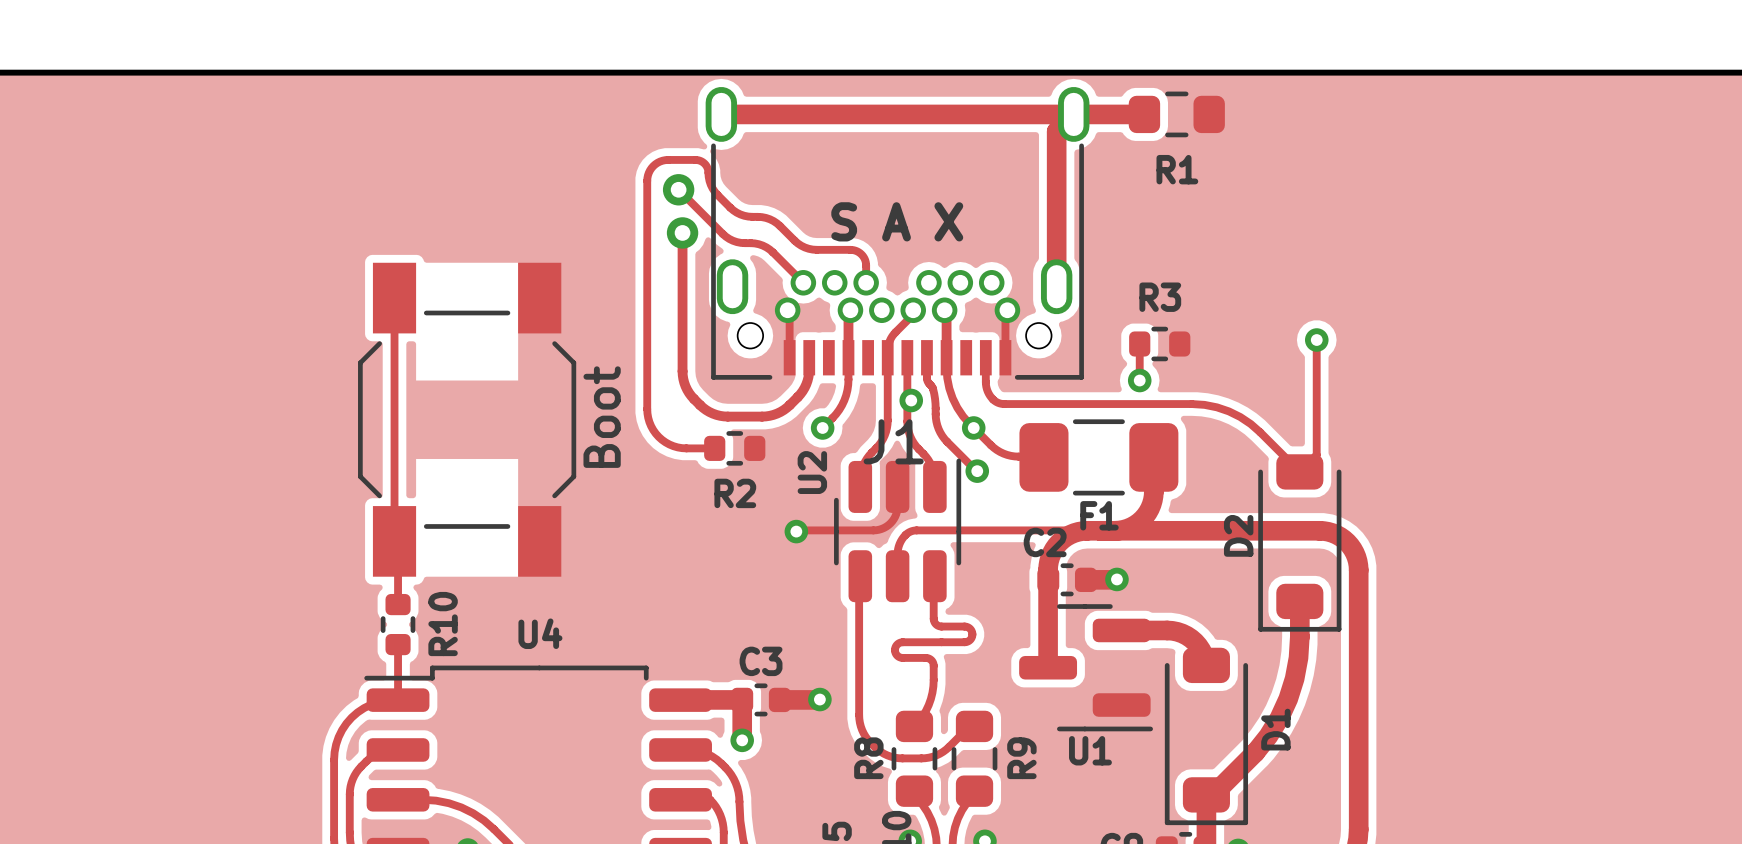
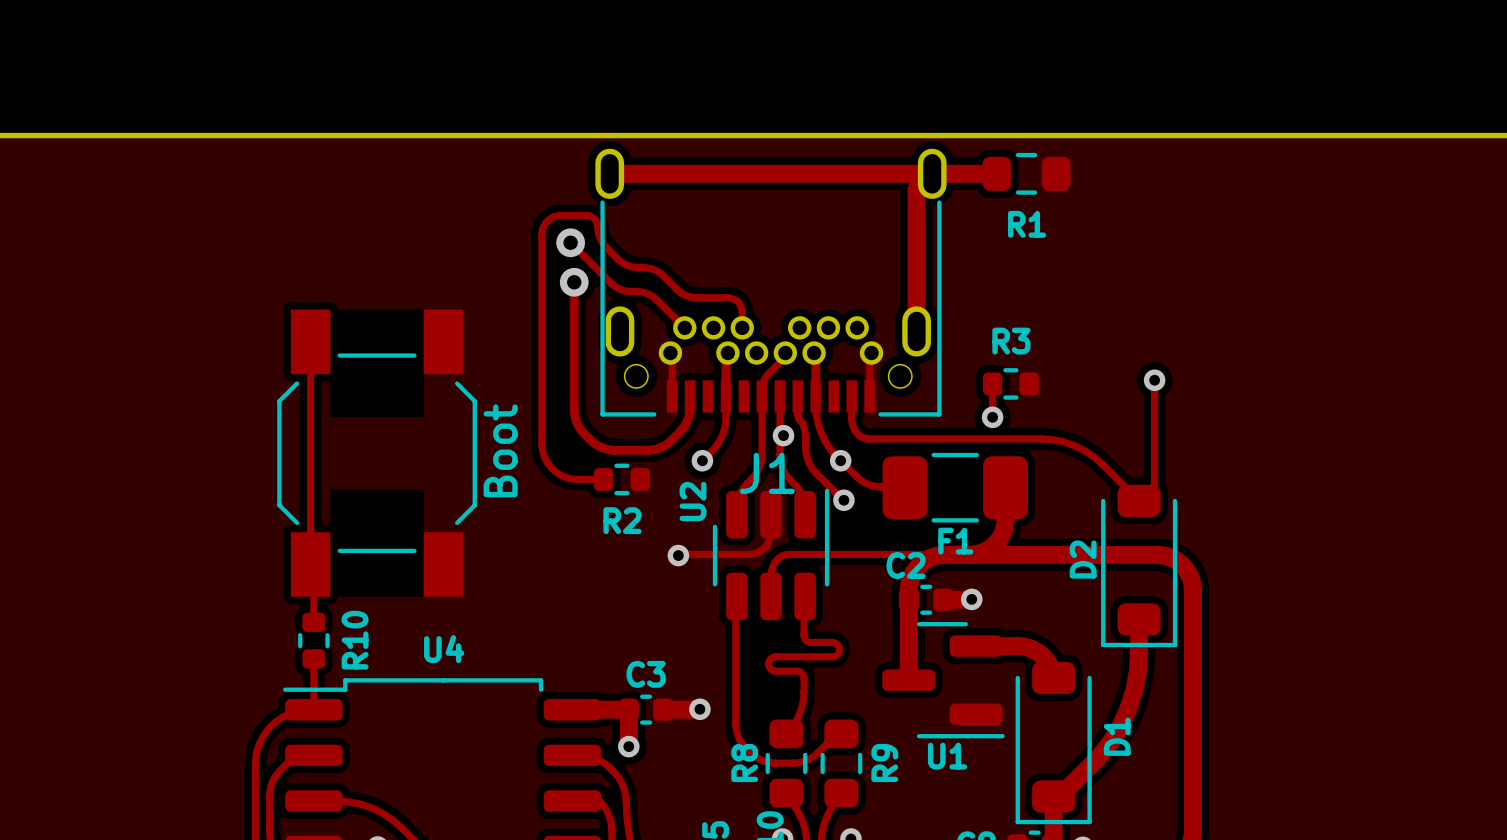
text: S A X (897, 221) -> none

